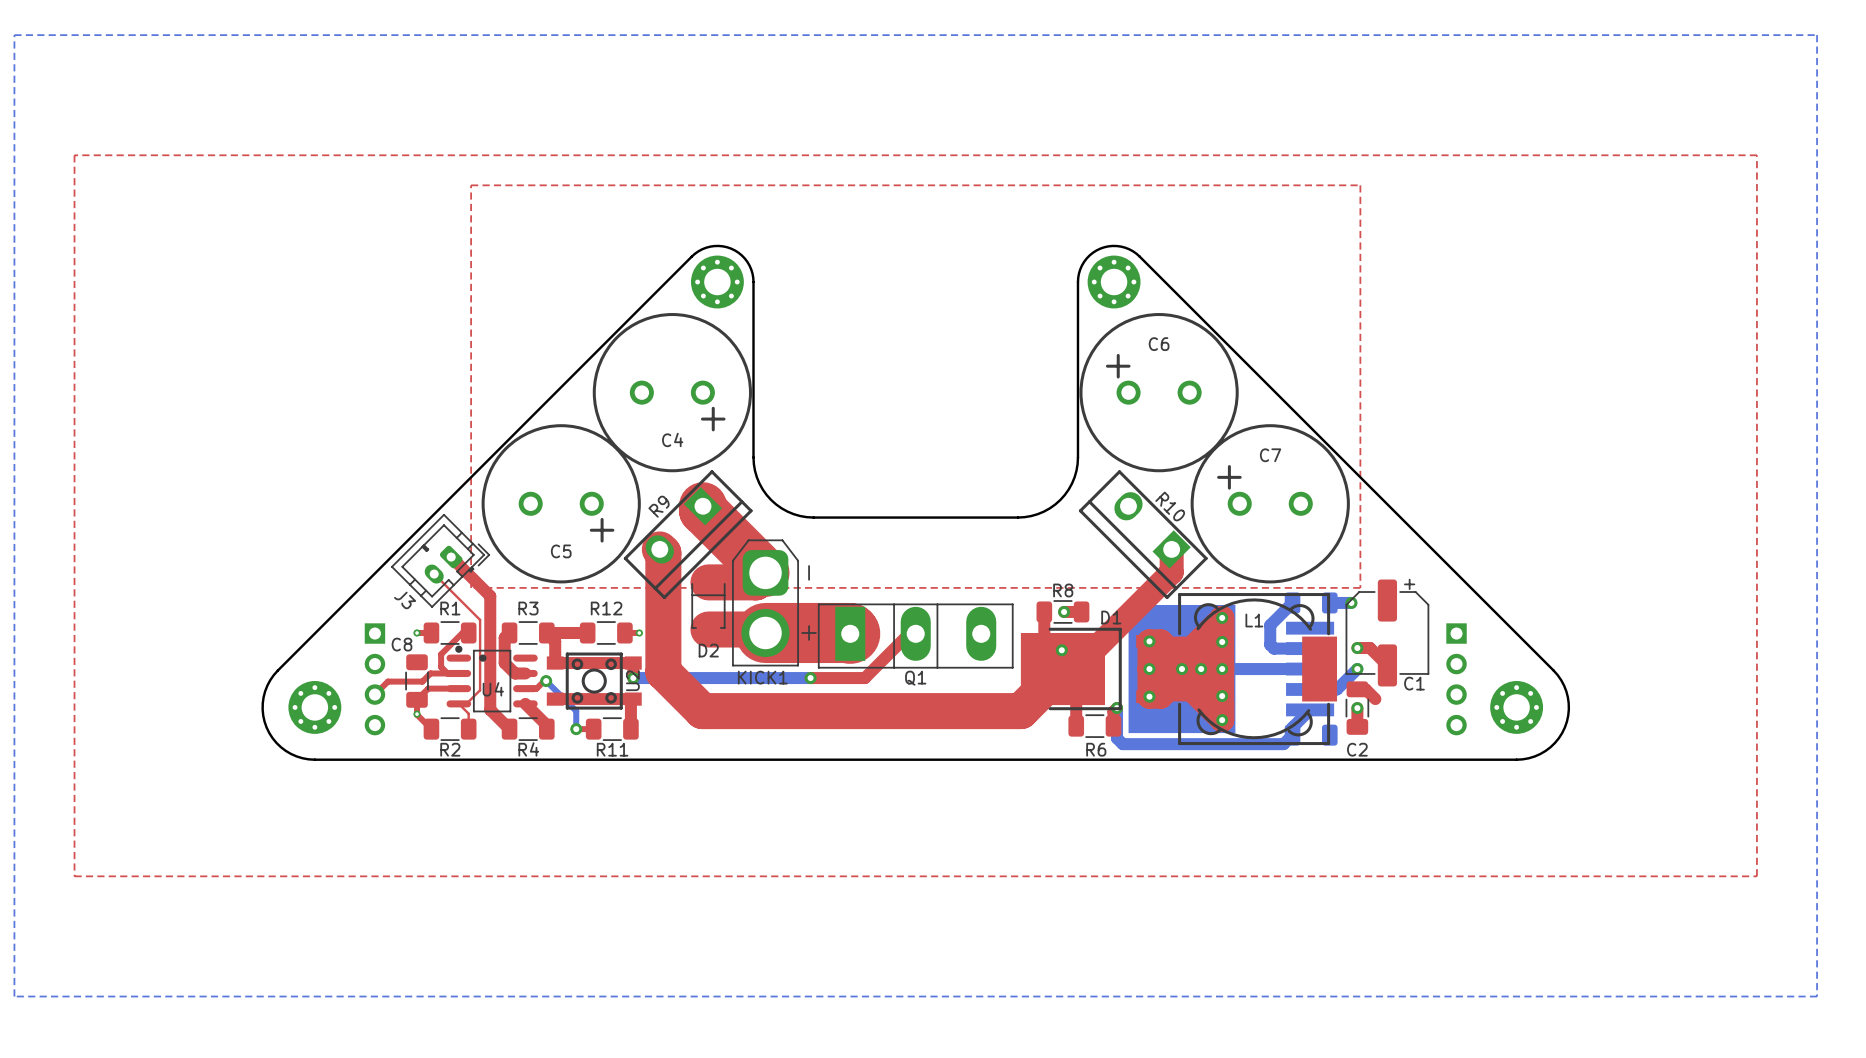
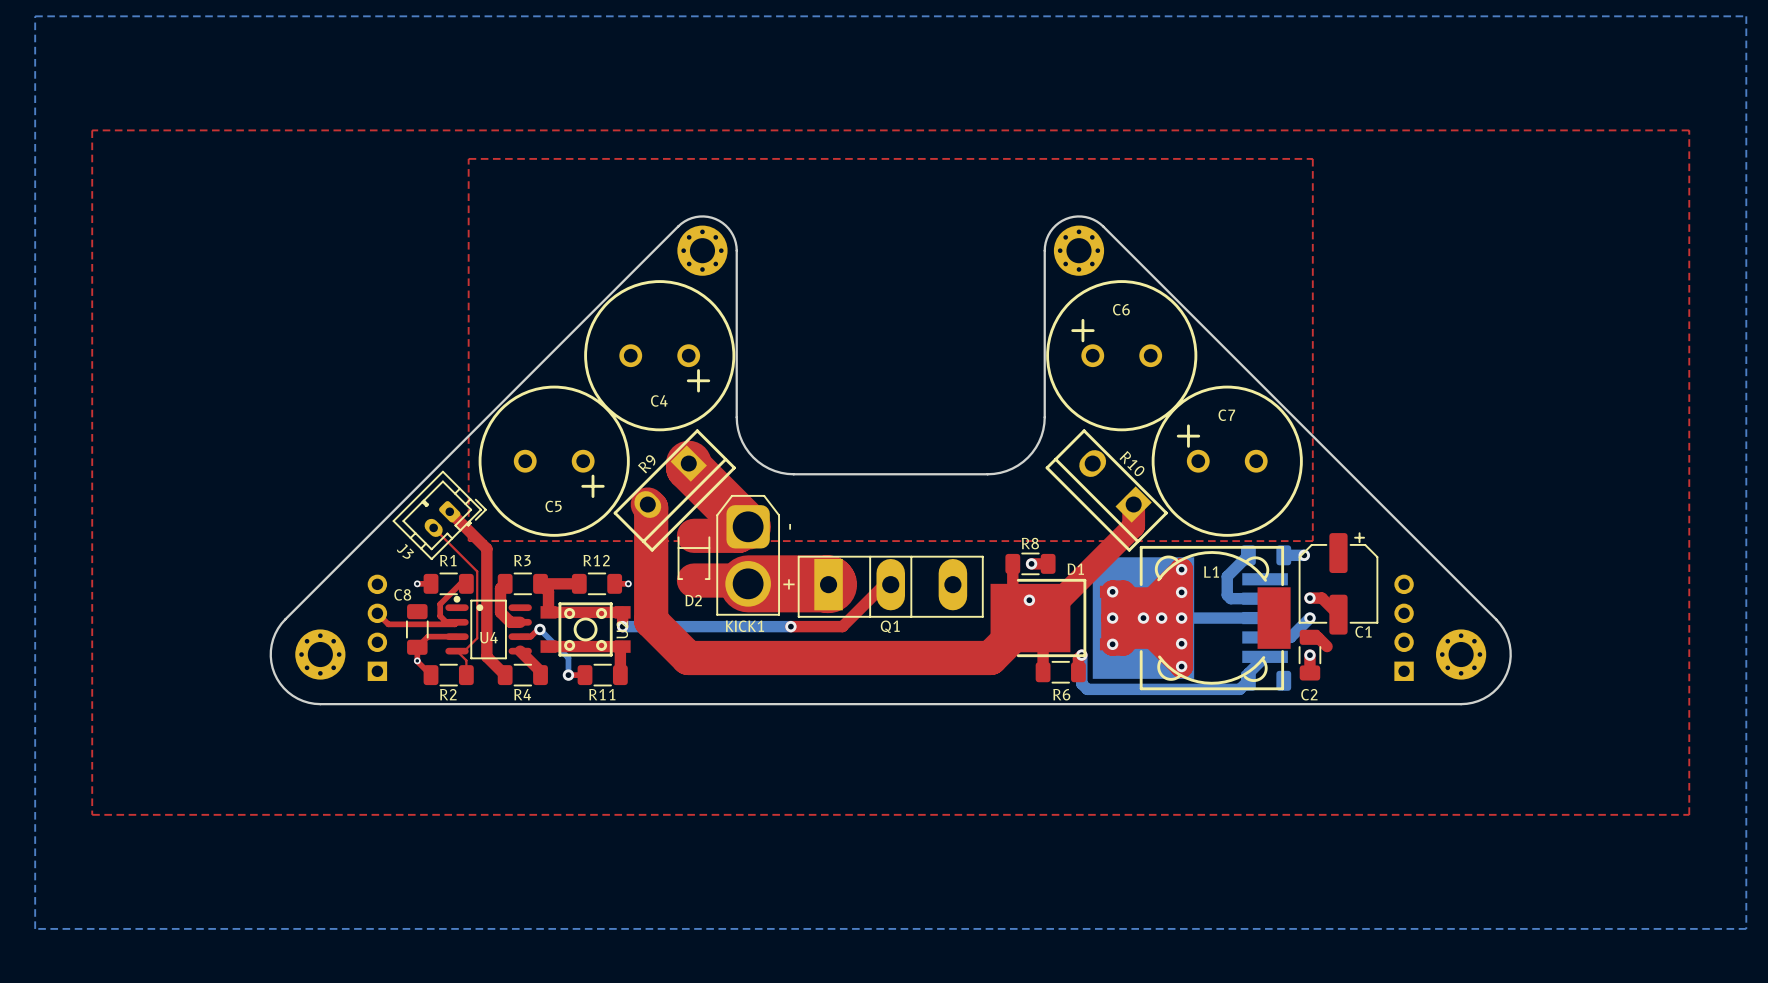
top track: none -> (377, 613) (388, 624) (454, 624) (457, 622)
top track: (447, 673) (430, 673) (422, 681) (387, 681) (374, 694) -> none
part rotation: 0° (374, 679) -> 180° (377, 627)
part rotation: 0° (1456, 679) -> 180° (1404, 627)

